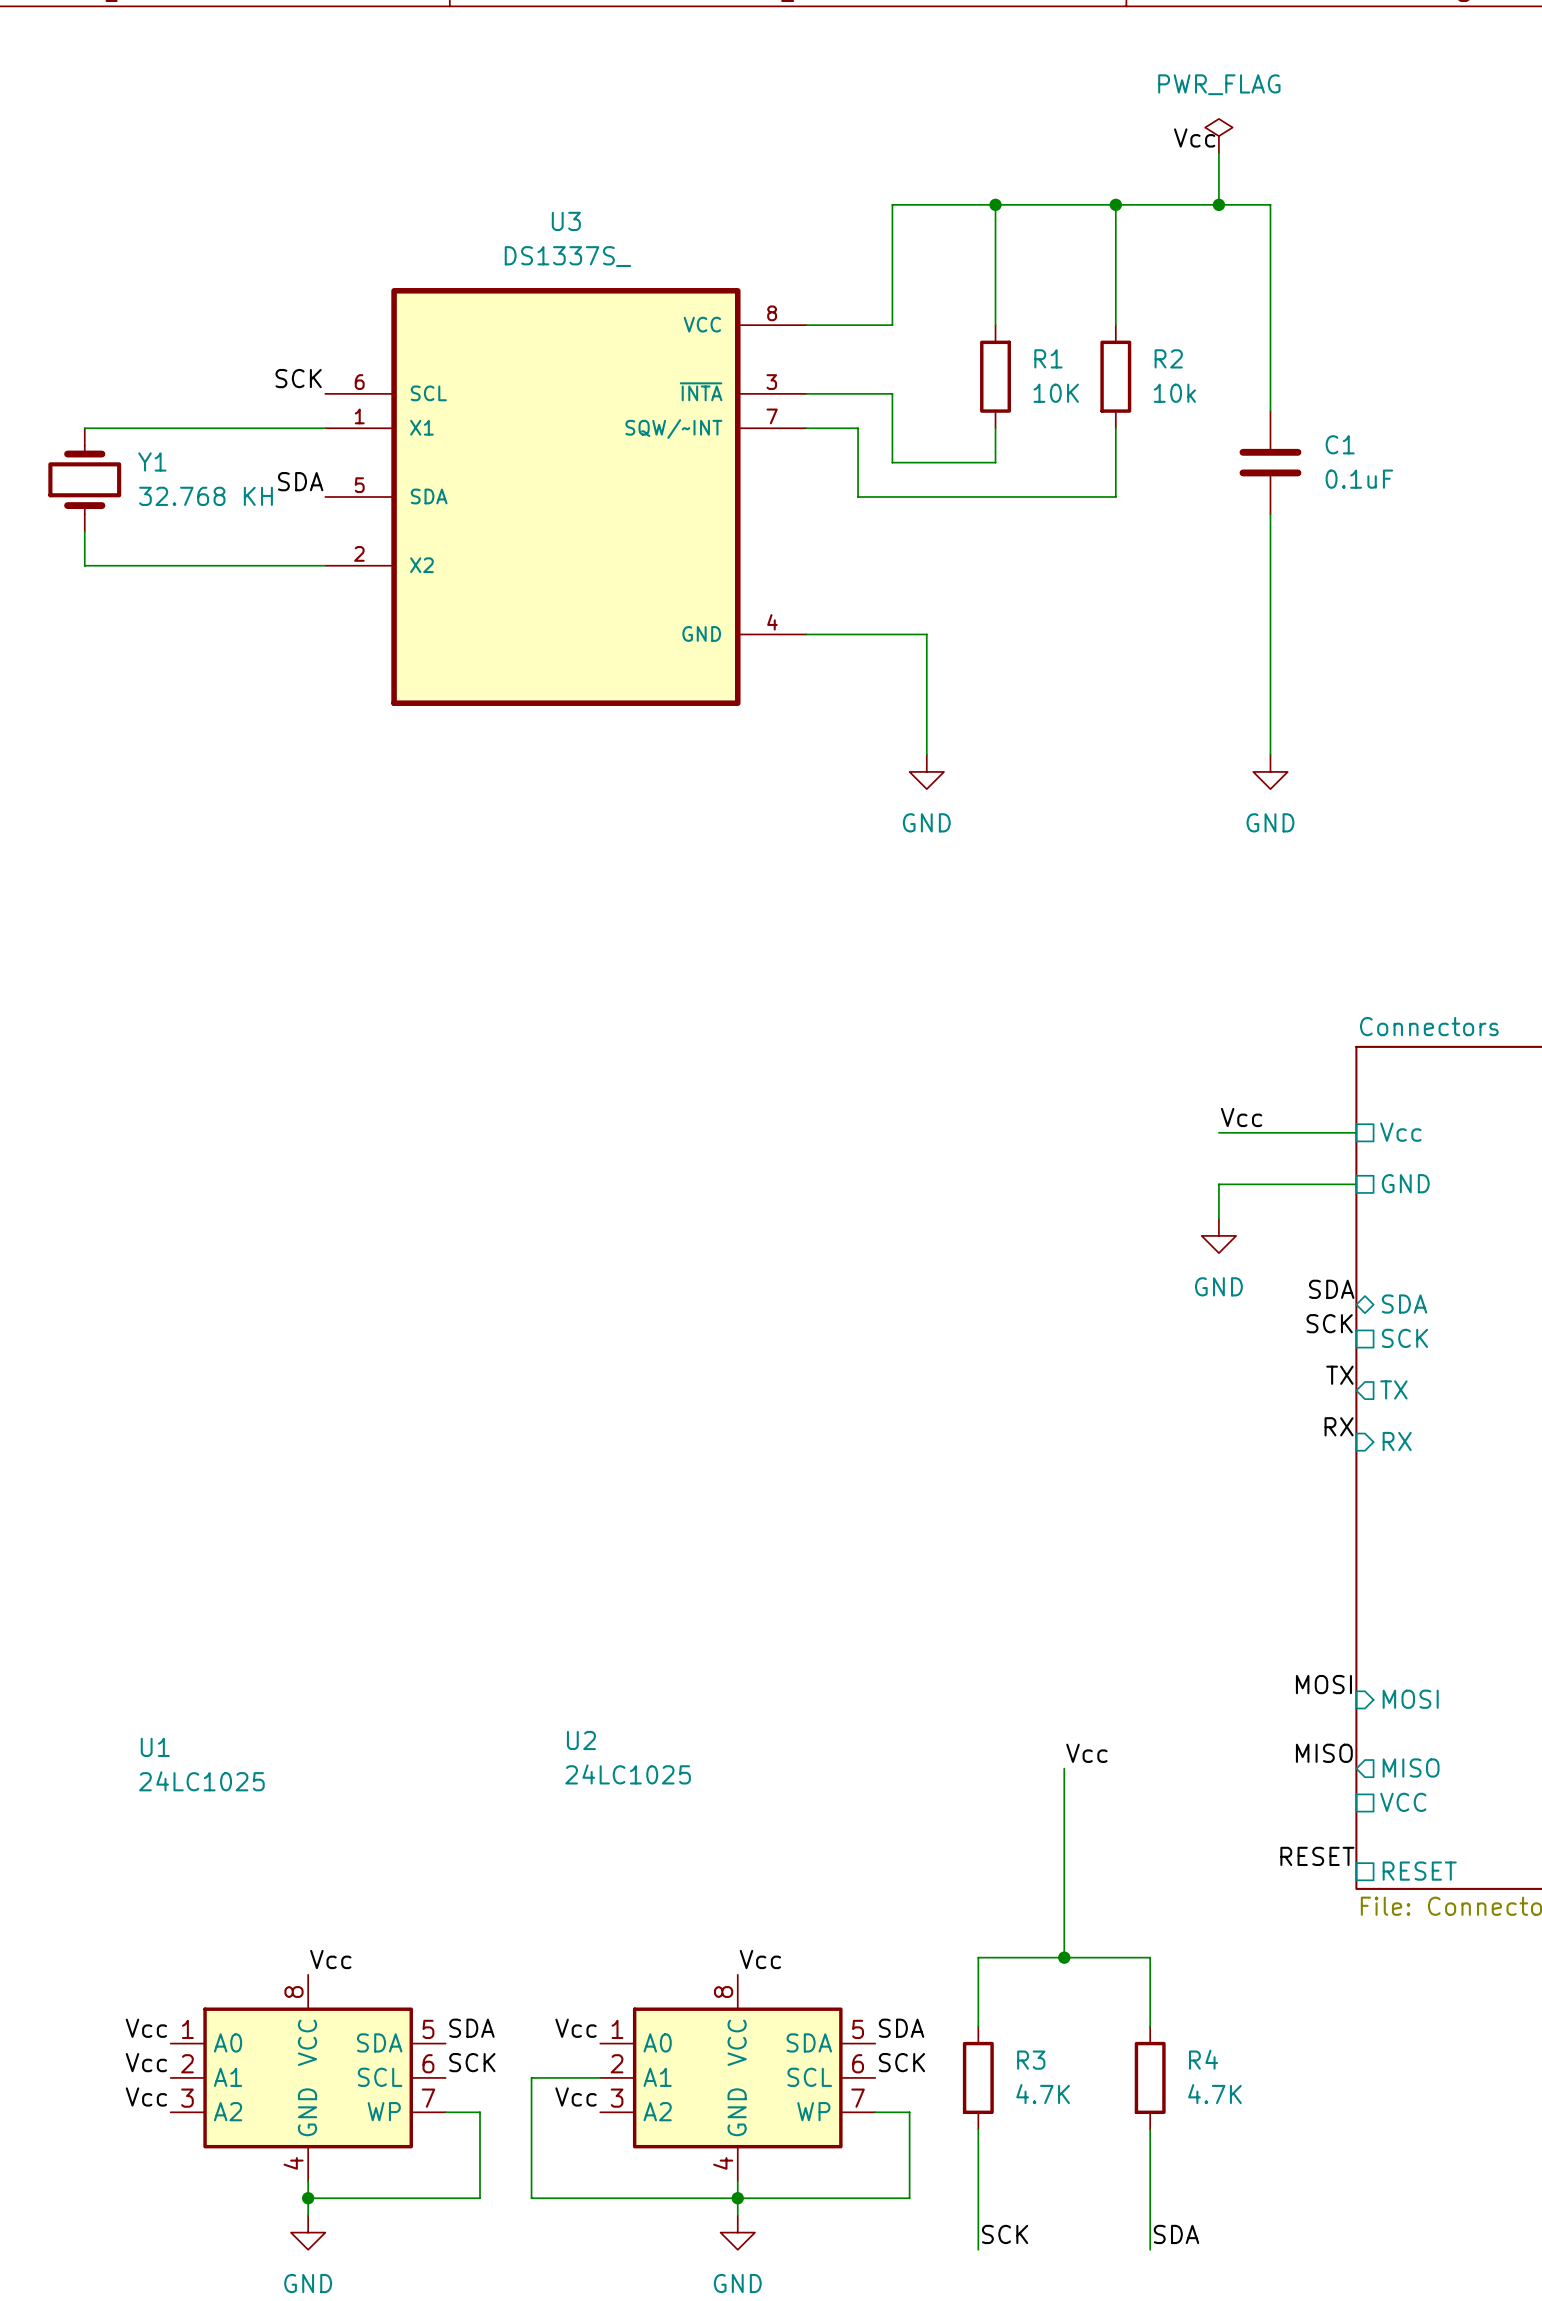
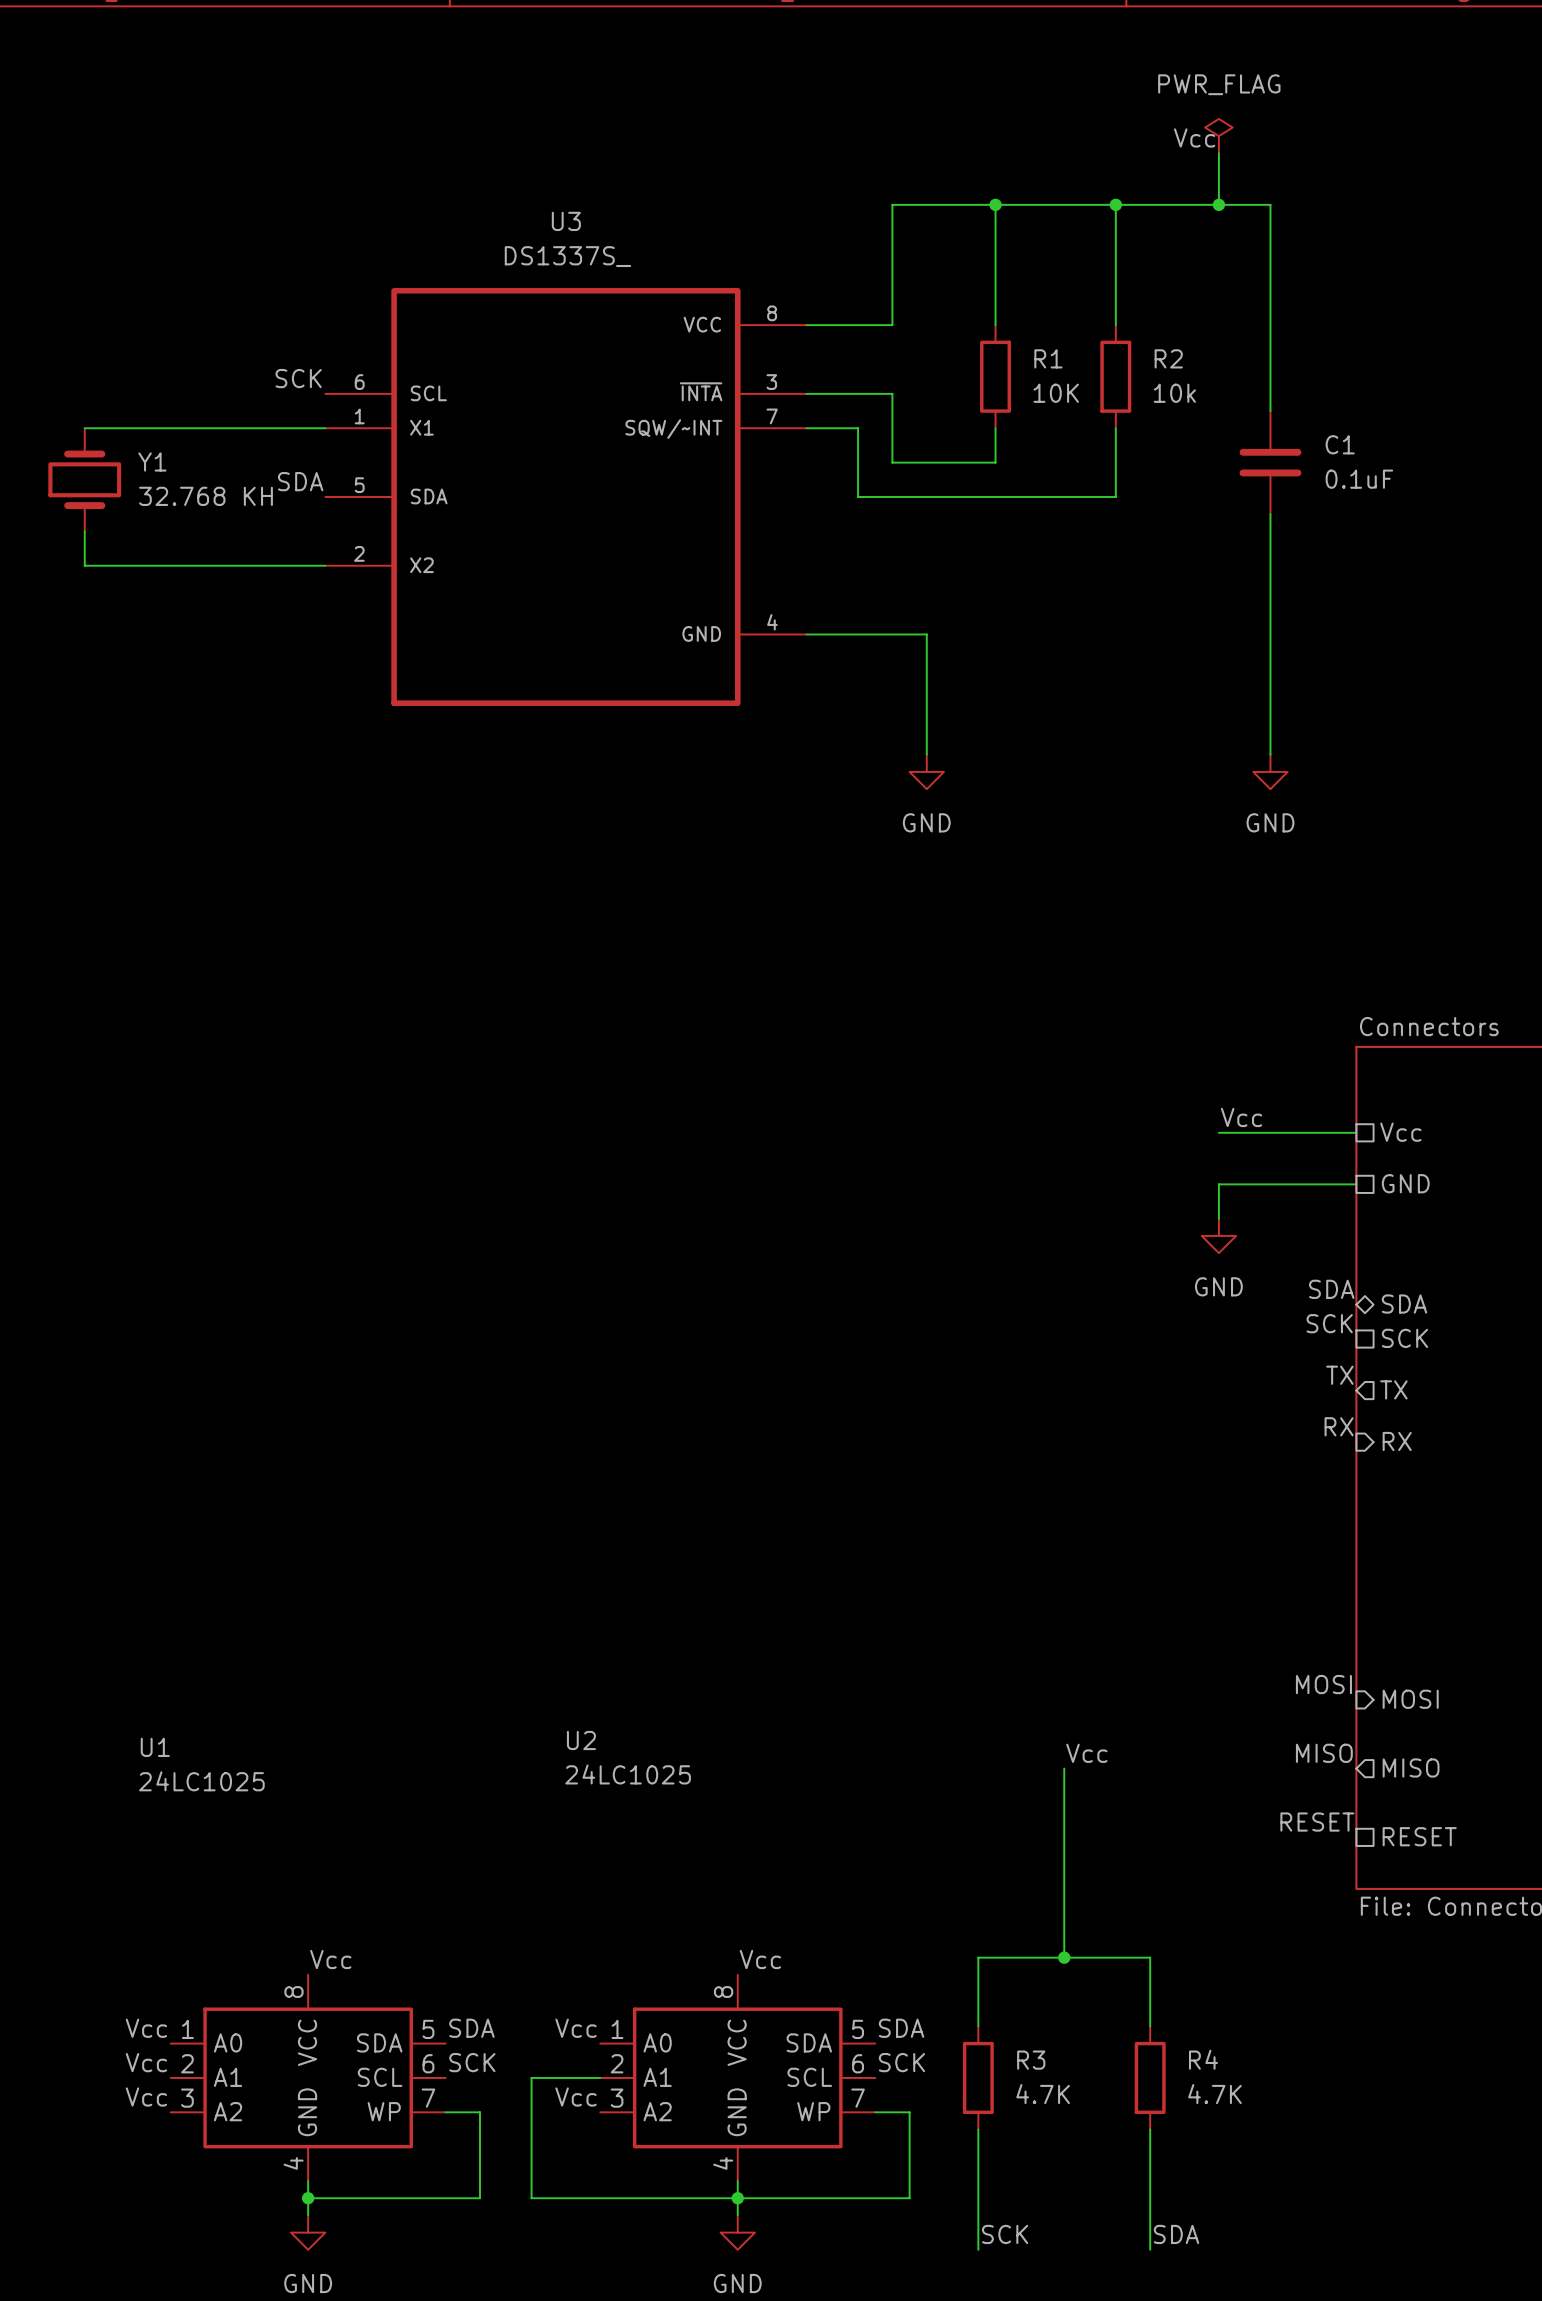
sheet pin: VCC (1403, 1802) -> none
label position: RESET (1317, 1856) -> RESET (1317, 1822)
sheet pin position: RESET (1419, 1871) -> RESET (1419, 1836)

